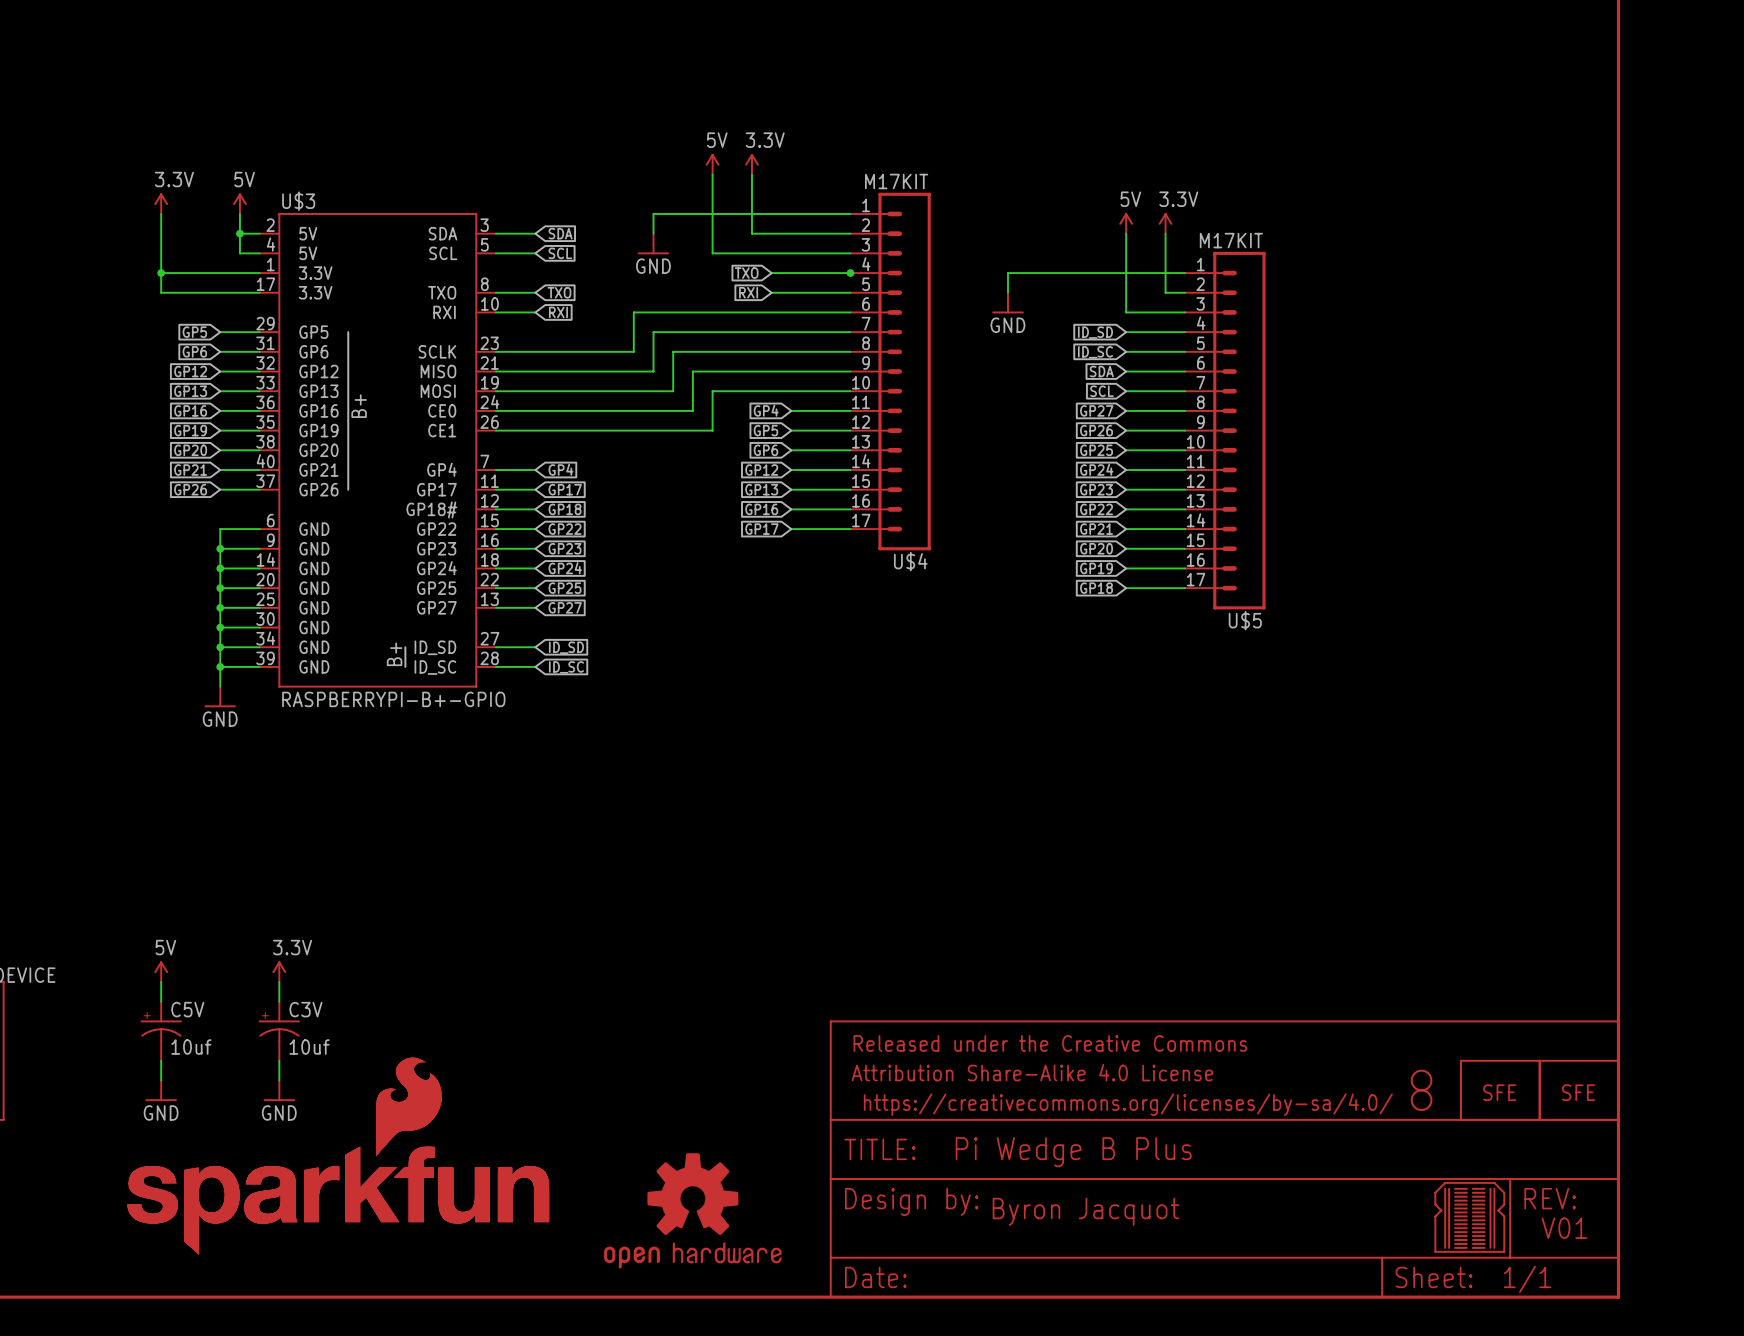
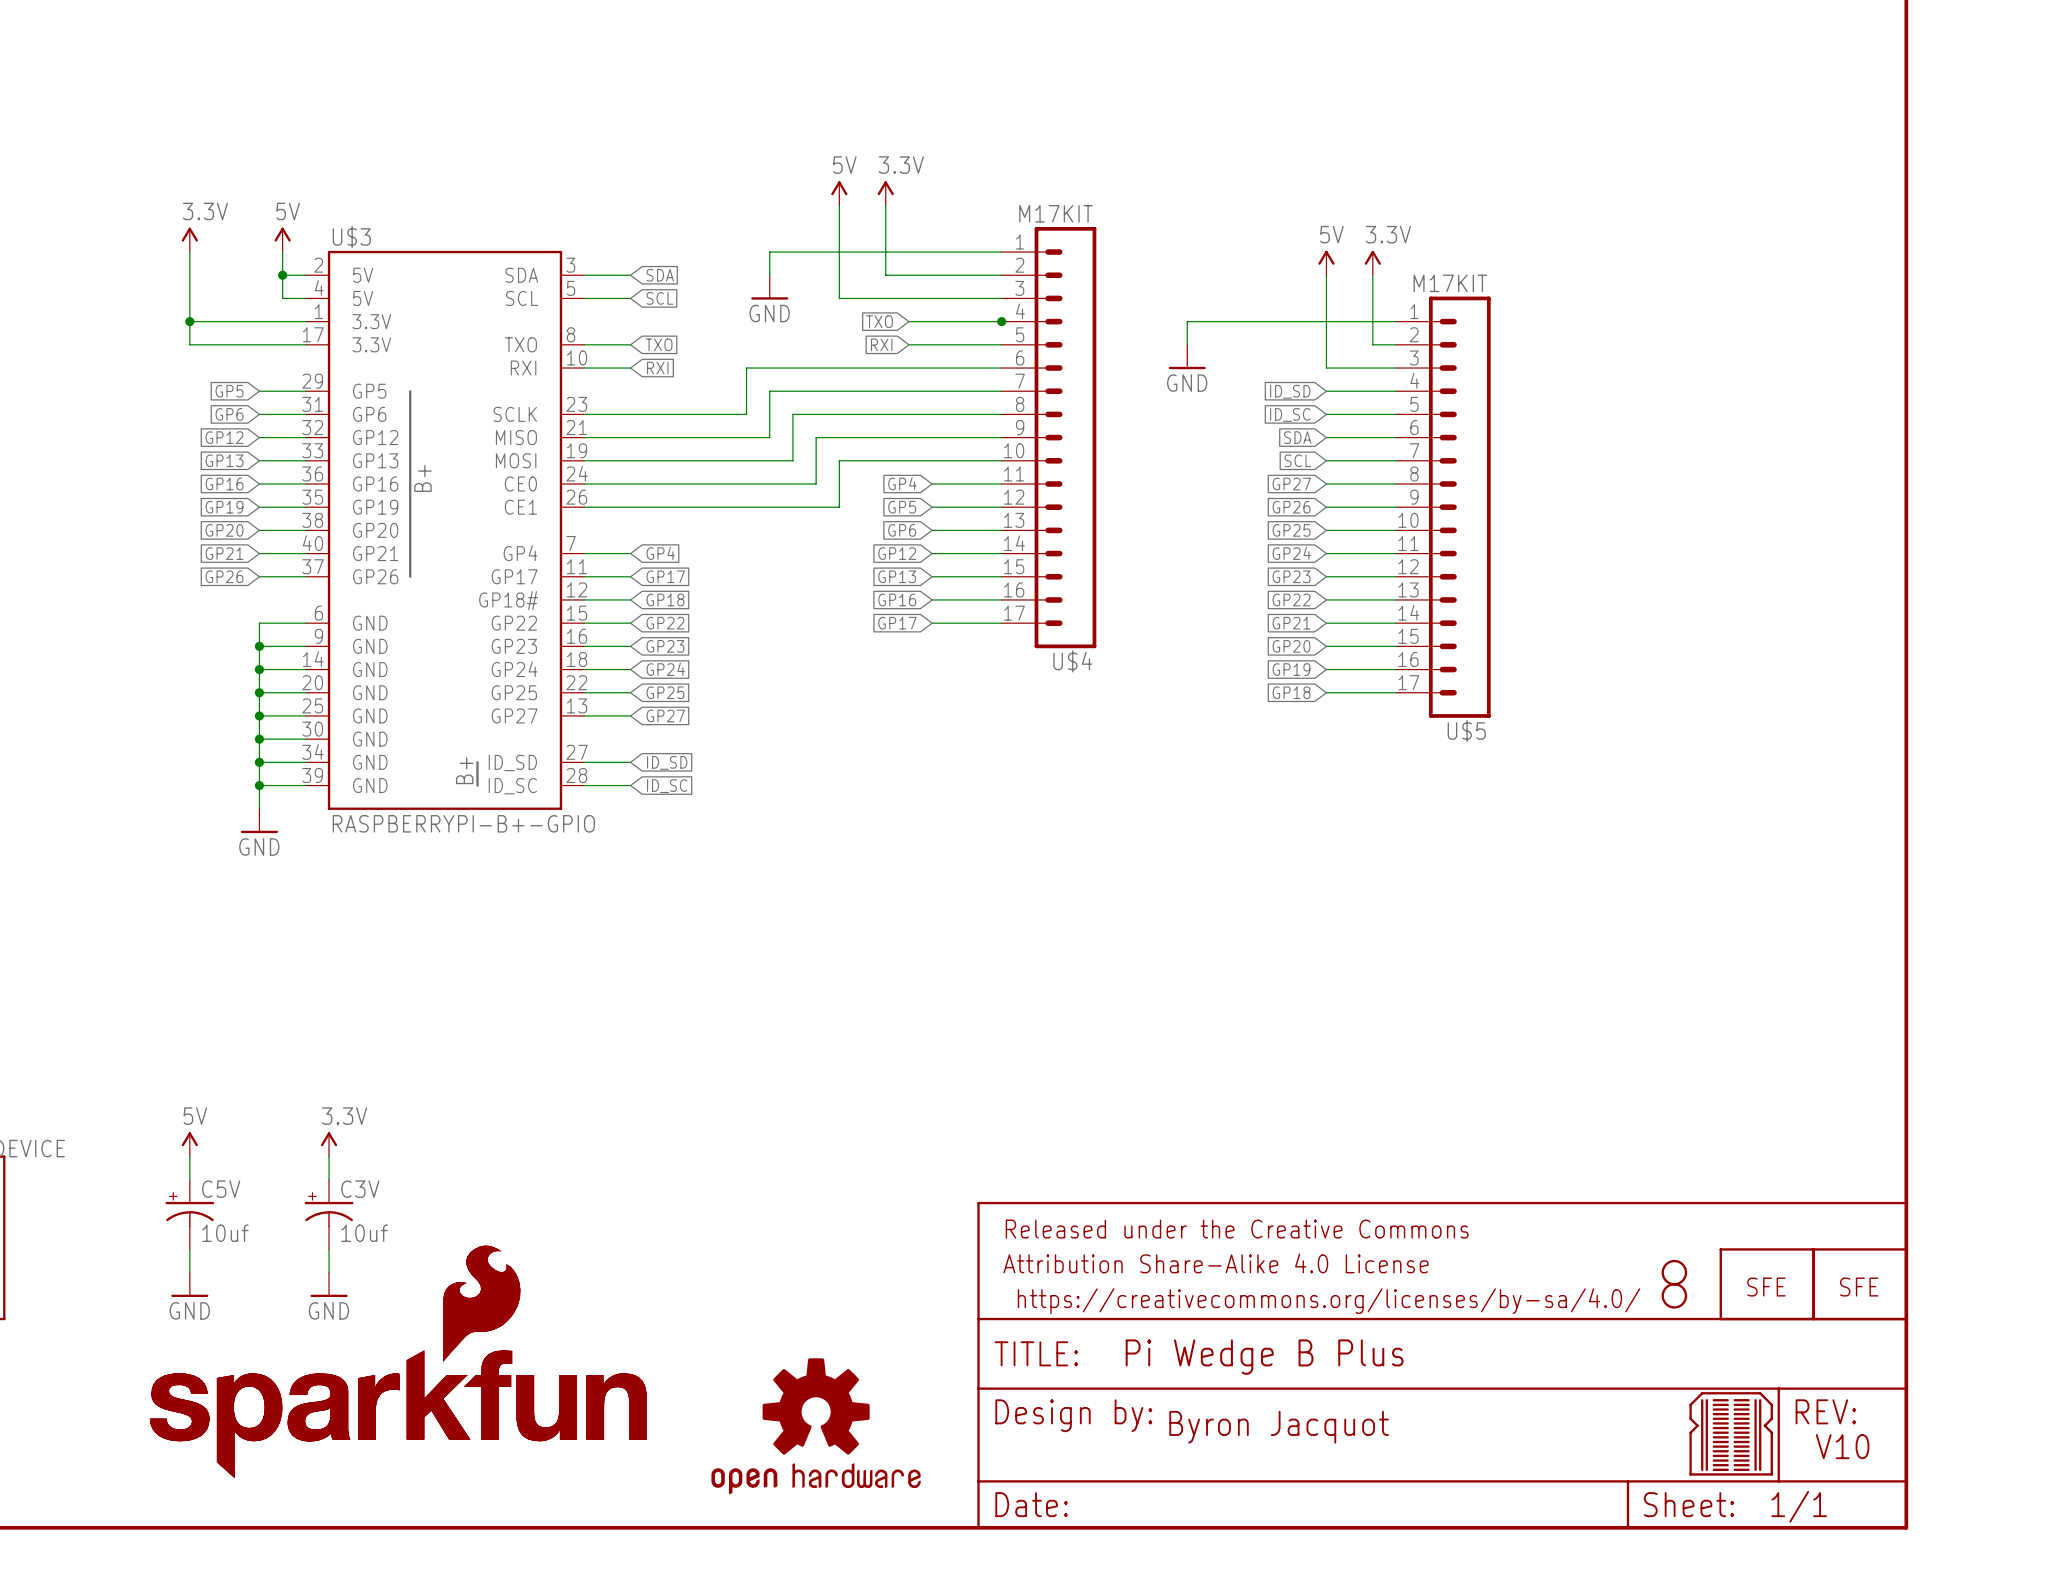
text: V01 (1564, 1228) -> V10 (1842, 1446)

